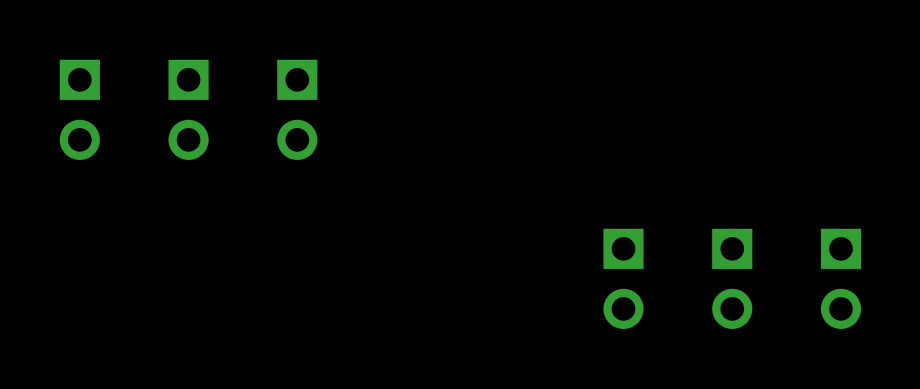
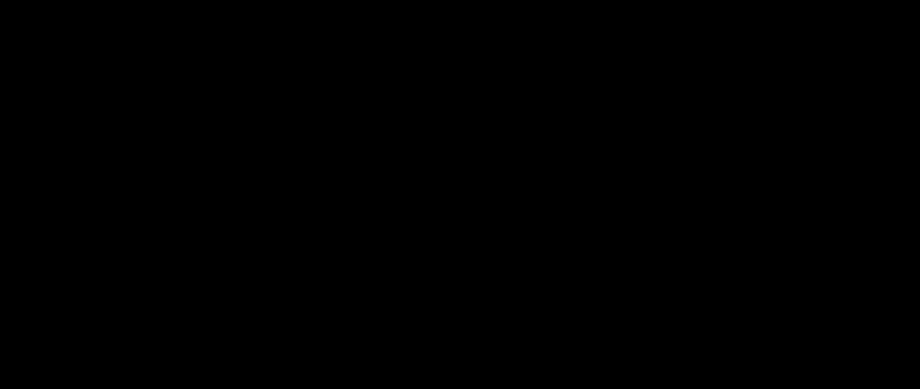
part: (79, 109) -> none
part: (188, 109) -> none
part: (297, 109) -> none
part: (623, 278) -> none
part: (732, 278) -> none
part: (840, 278) -> none

